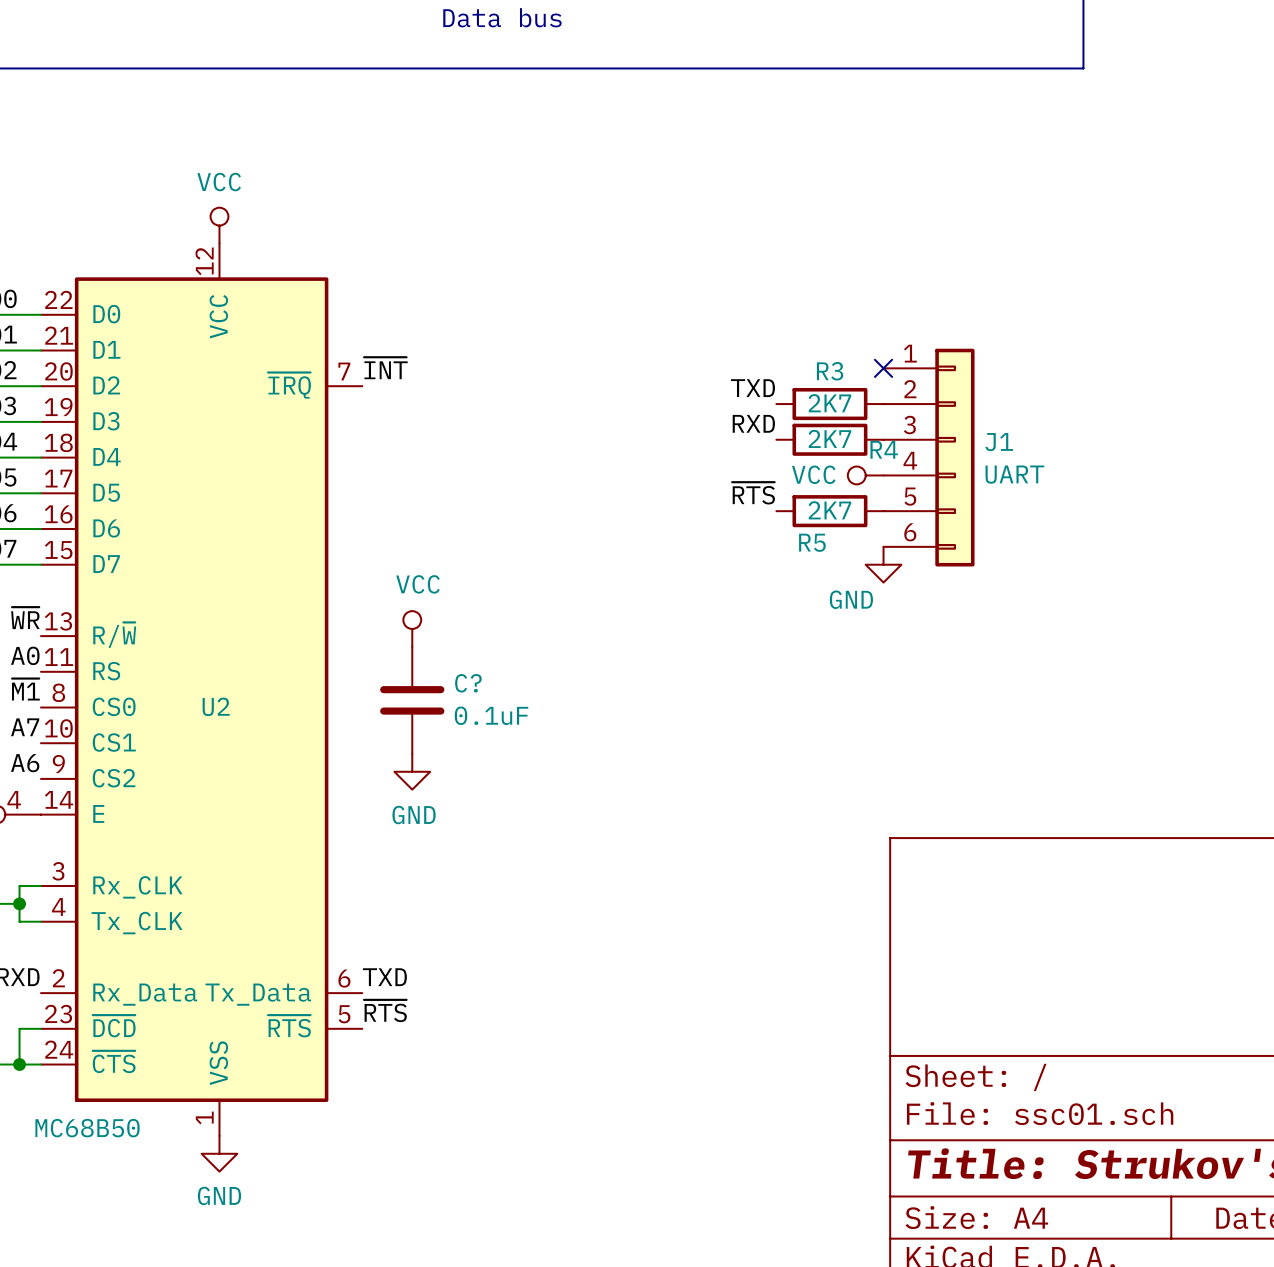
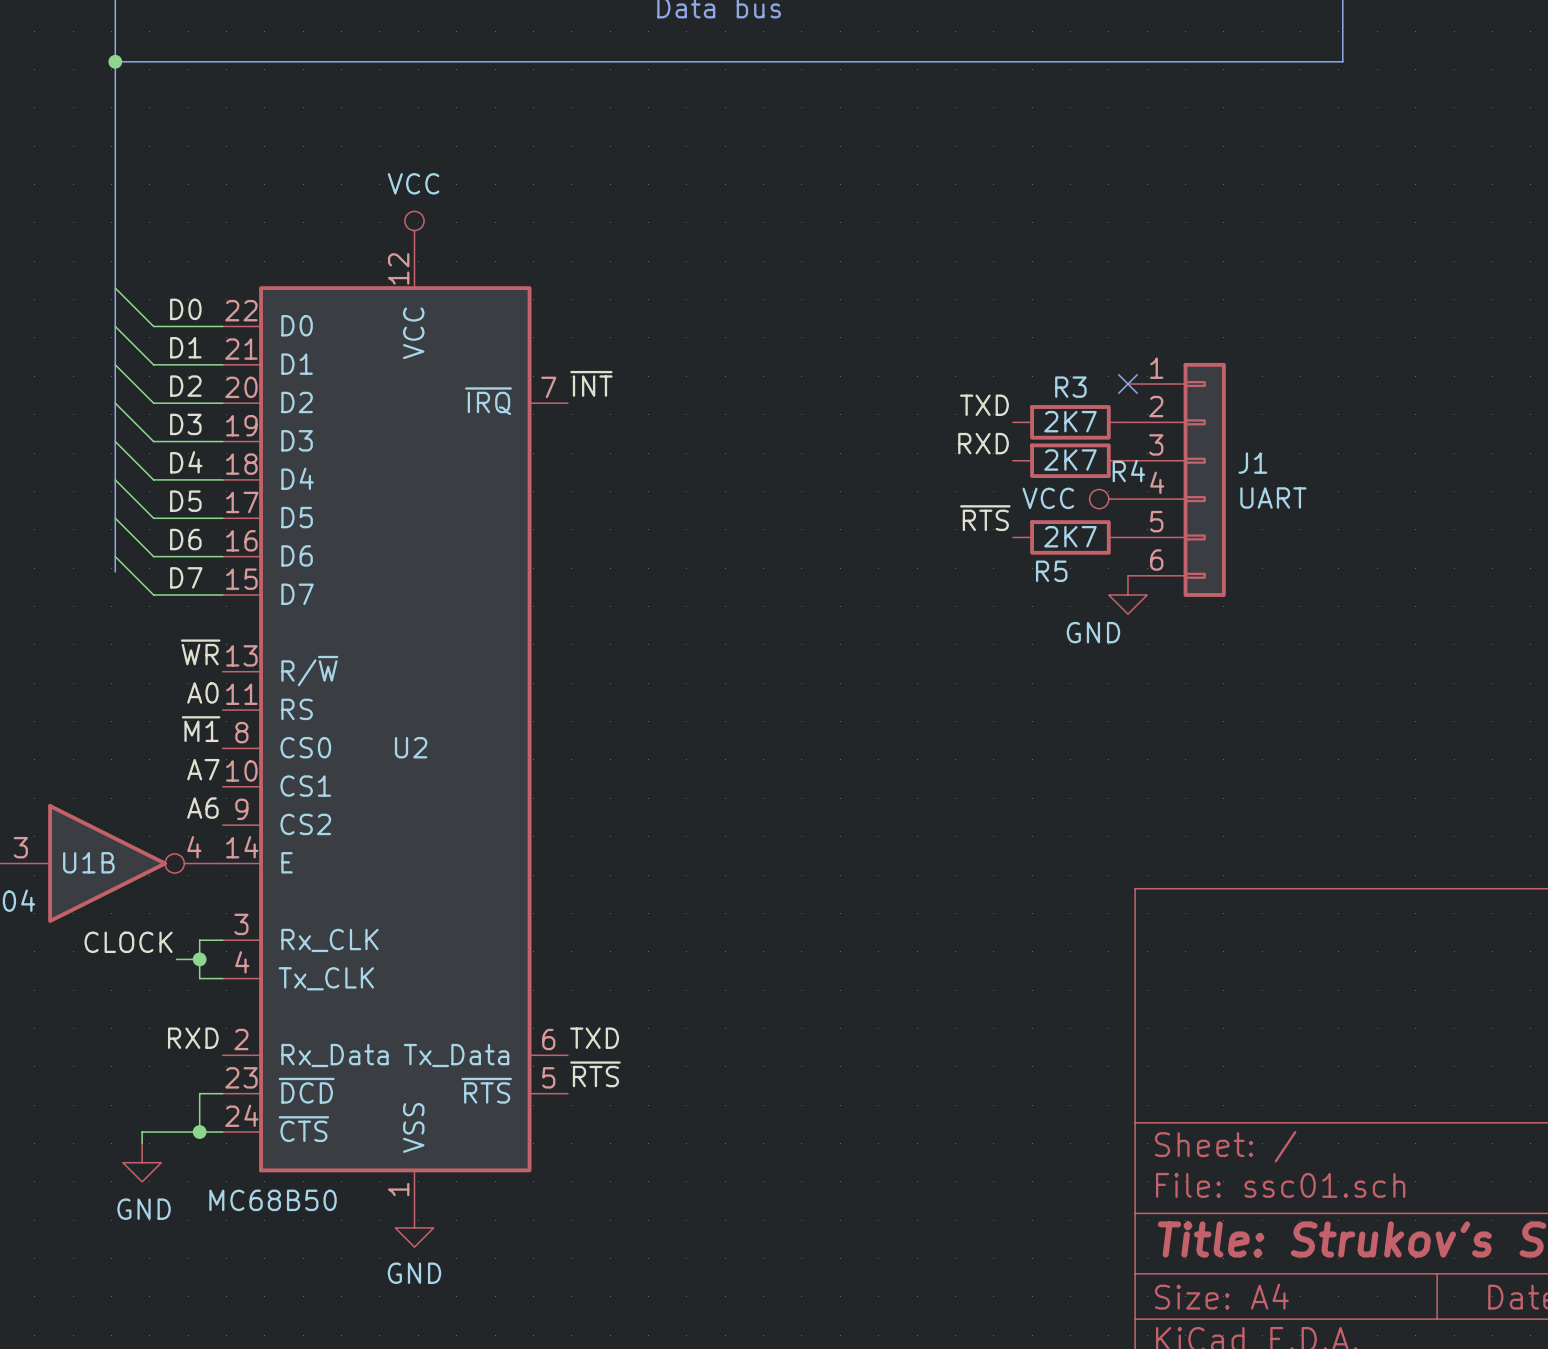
power symbol: VCC (412, 628) -> none
C?: 0.1uF (412, 700) -> none
power symbol: GND (412, 771) -> none

